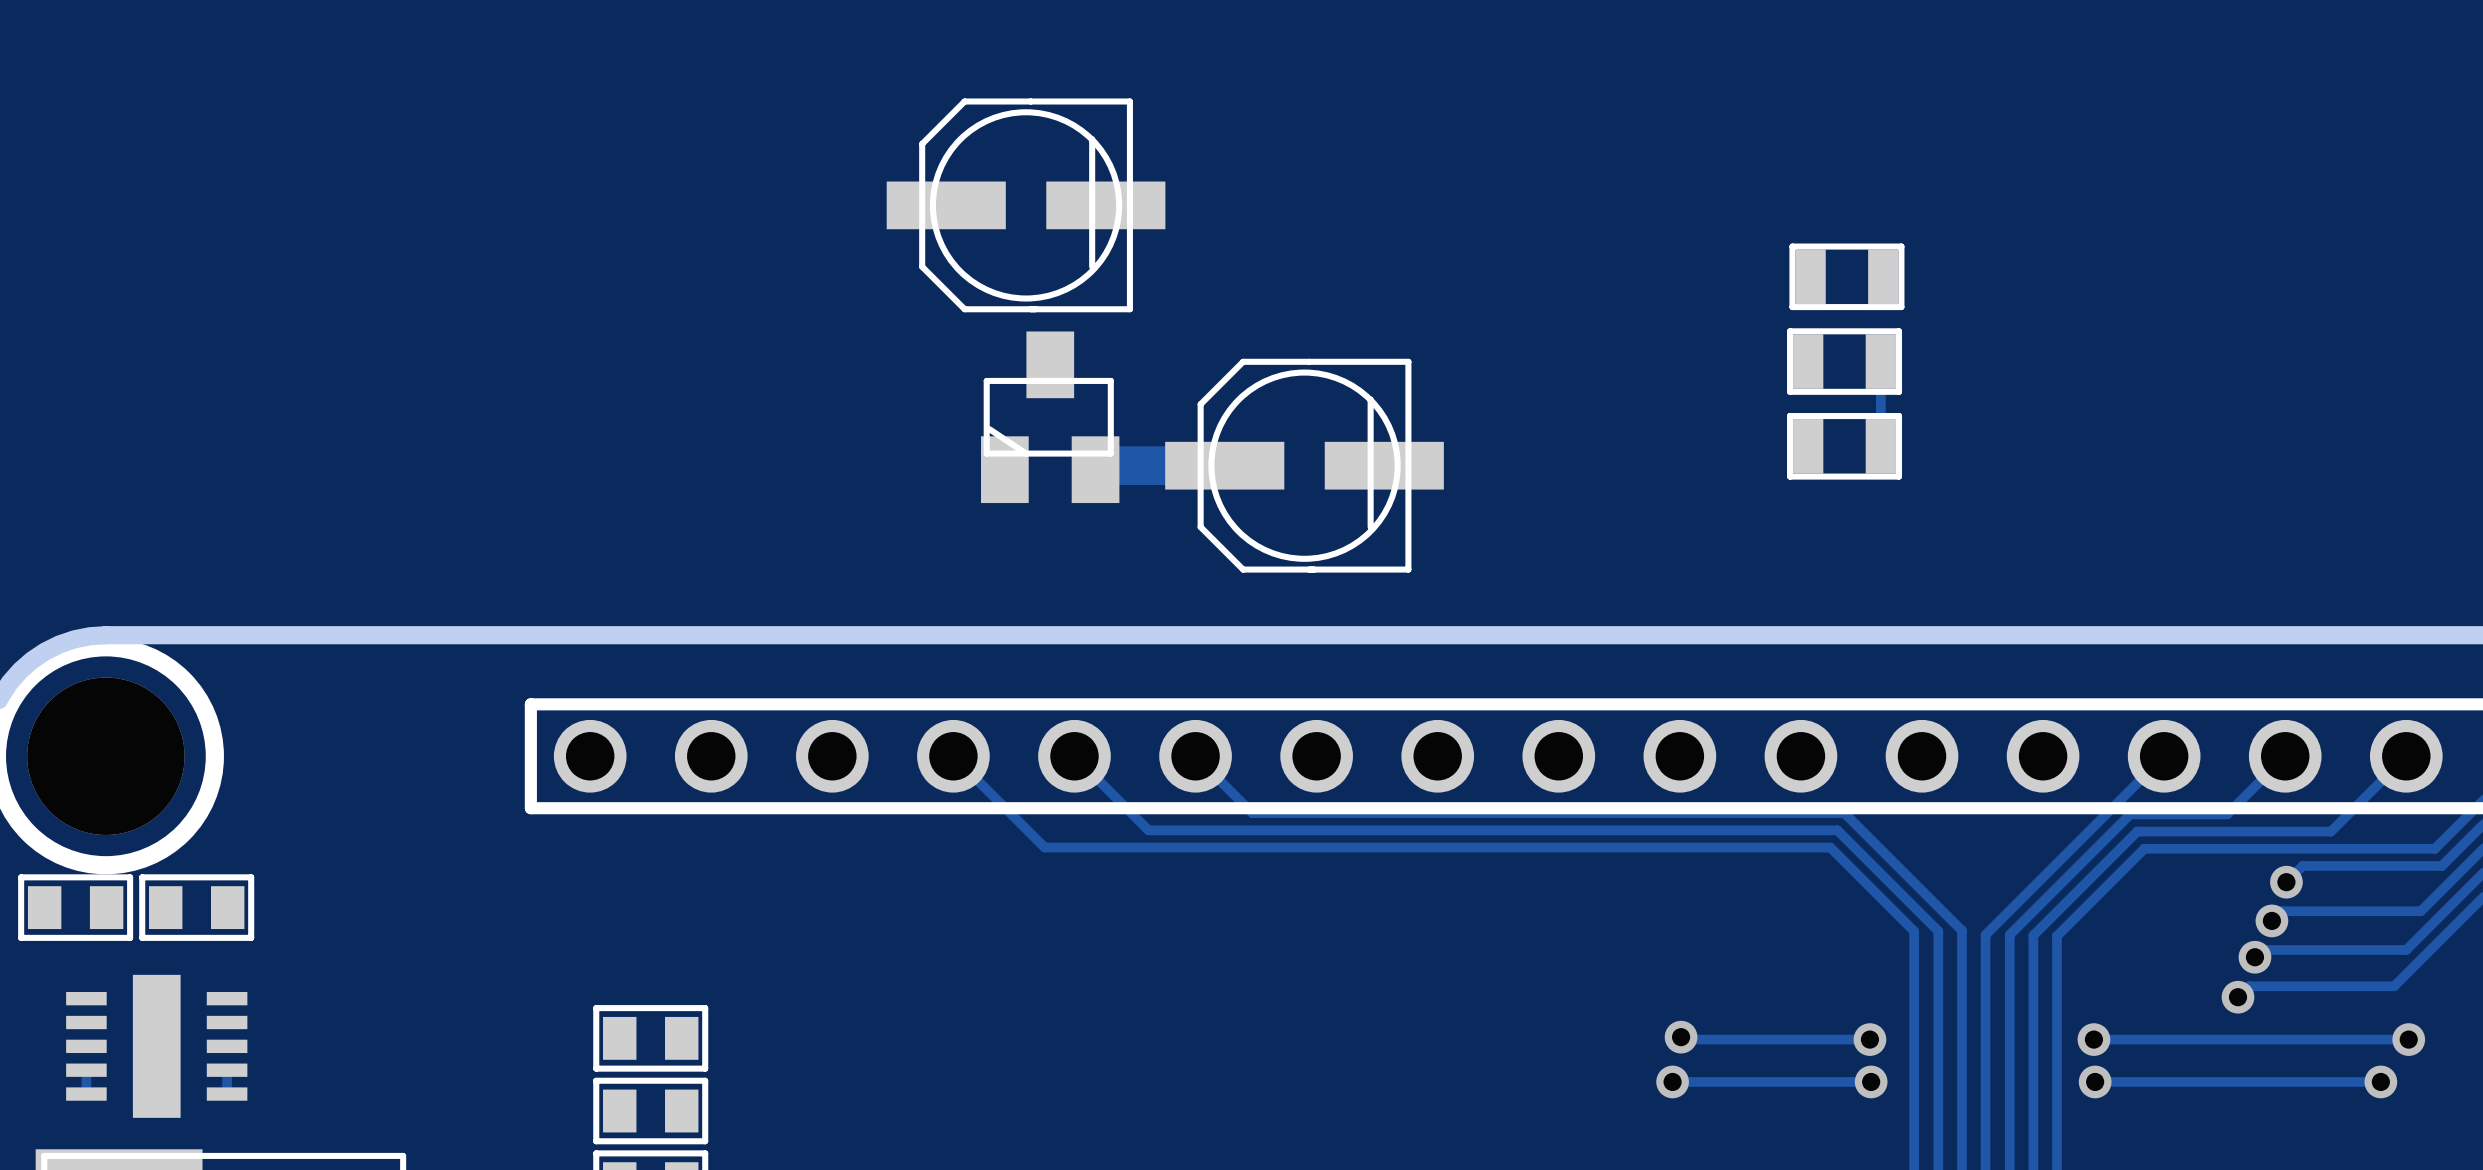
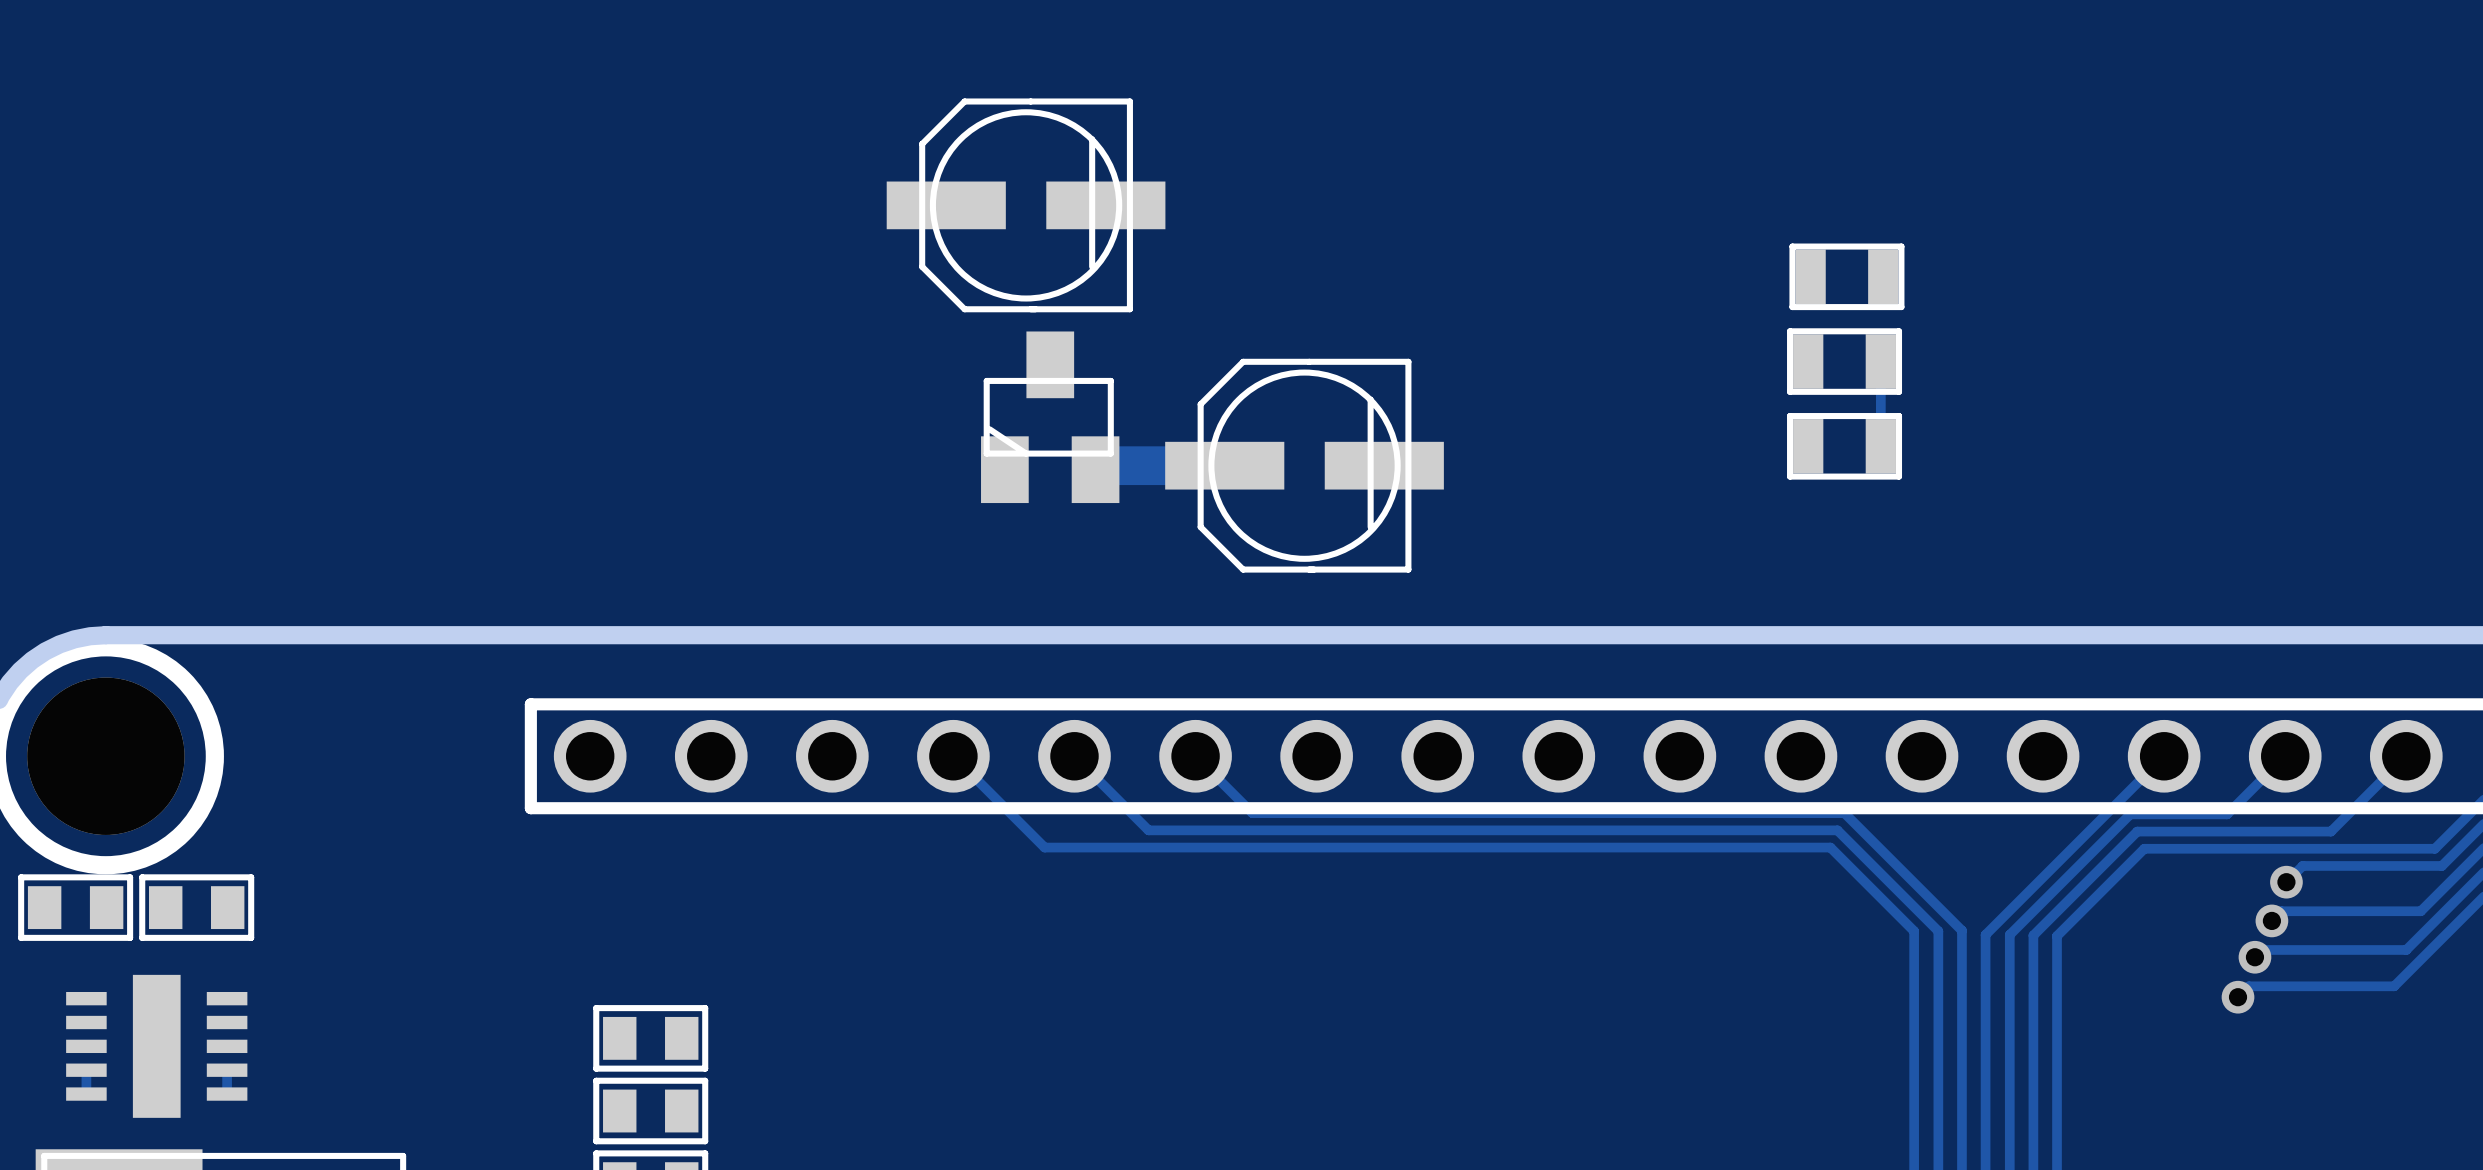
track: (1681, 1037) (1683, 1039) (1869, 1039) -> none
via: (1681, 1037) -> none
via: (1869, 1039) -> none
track: (2093, 1039) (2408, 1039) -> none
via: (2093, 1039) -> none
via: (2408, 1039) -> none
track: (1672, 1081) (1871, 1081) -> none
via: (1672, 1081) -> none
via: (1871, 1081) -> none
track: (2095, 1081) (2380, 1081) -> none
via: (2095, 1081) -> none
via: (2380, 1081) -> none

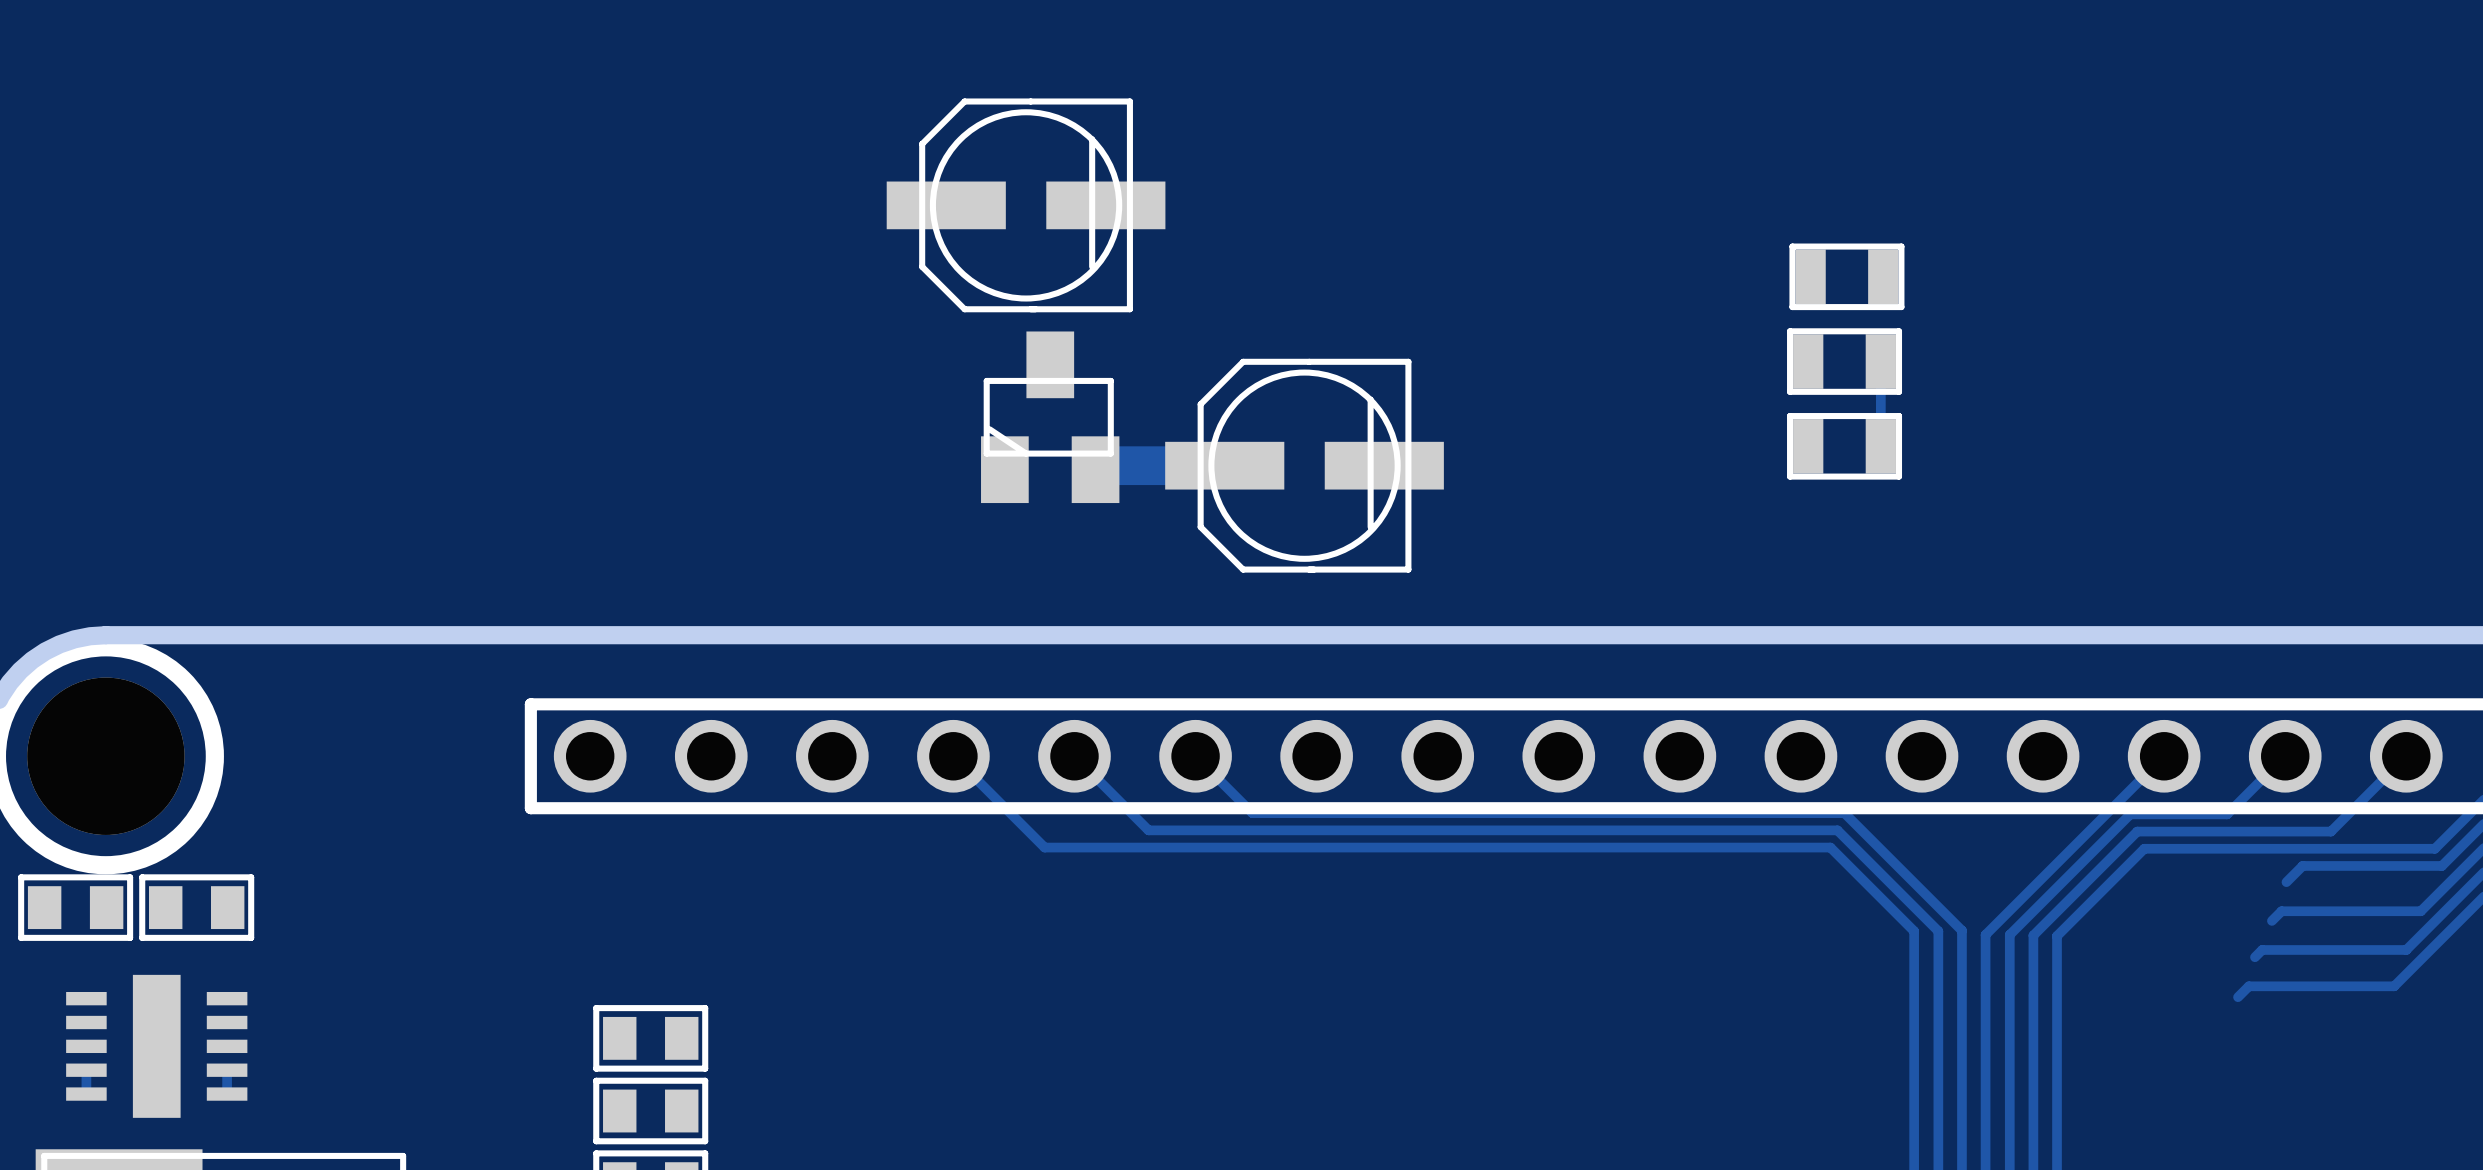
via: (2286, 882) -> none
via: (2271, 920) -> none
via: (2254, 957) -> none
via: (2238, 997) -> none

